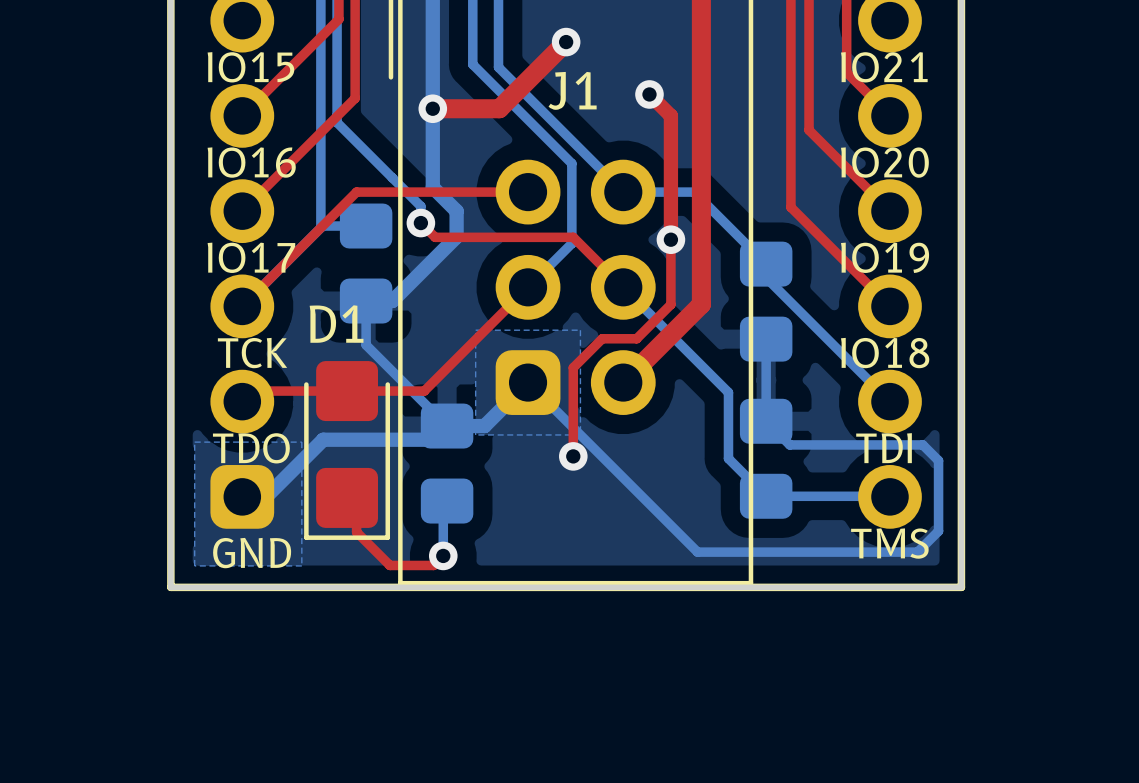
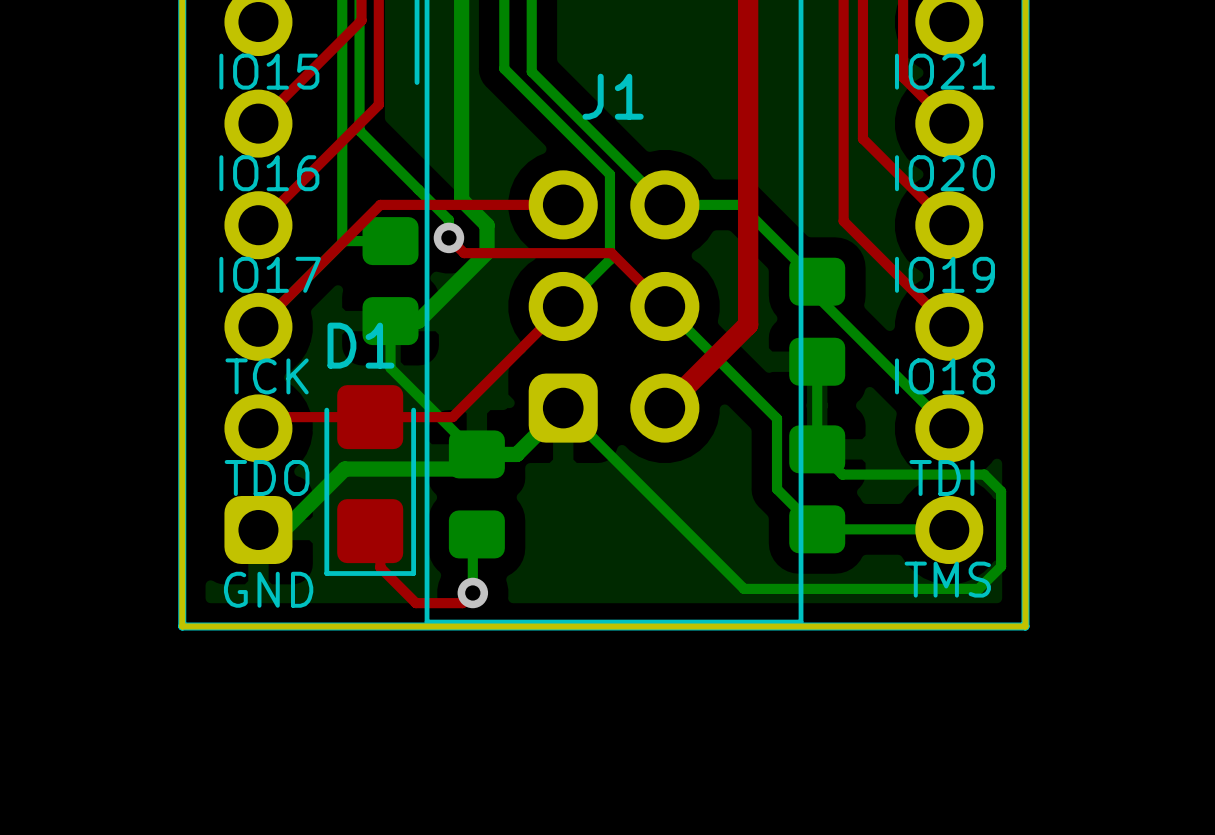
top track: (566, 42) (499, 108) (432, 108) -> none
via: (566, 42) -> none
top track: (649, 94) (670, 115) (670, 304) (636, 338) (602, 338) (573, 367) (573, 456) -> none
via: (649, 94) -> none
via: (432, 108) -> none
via: (670, 239) -> none
bottom zone outline: (475, 330) (475, 434) (580, 434) (580, 330) (475, 330) -> none
bottom zone outline: (194, 442) (194, 565) (301, 565) (301, 442) (194, 442) -> none
via: (573, 456) -> none

